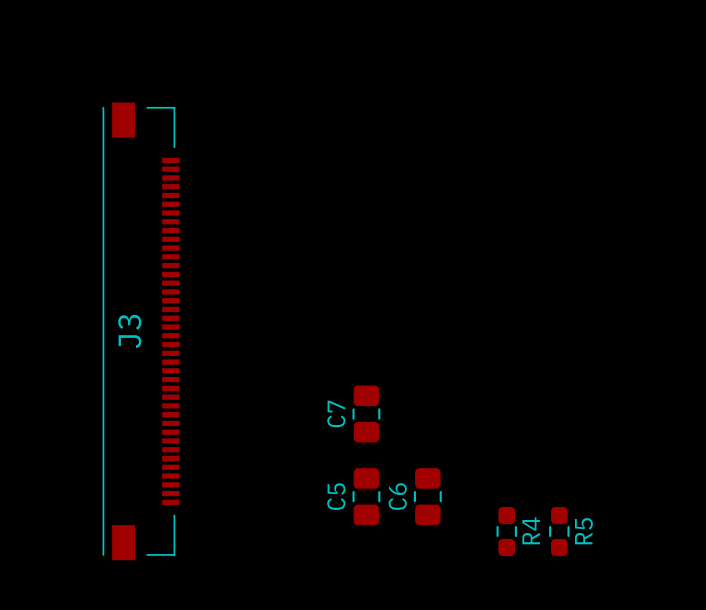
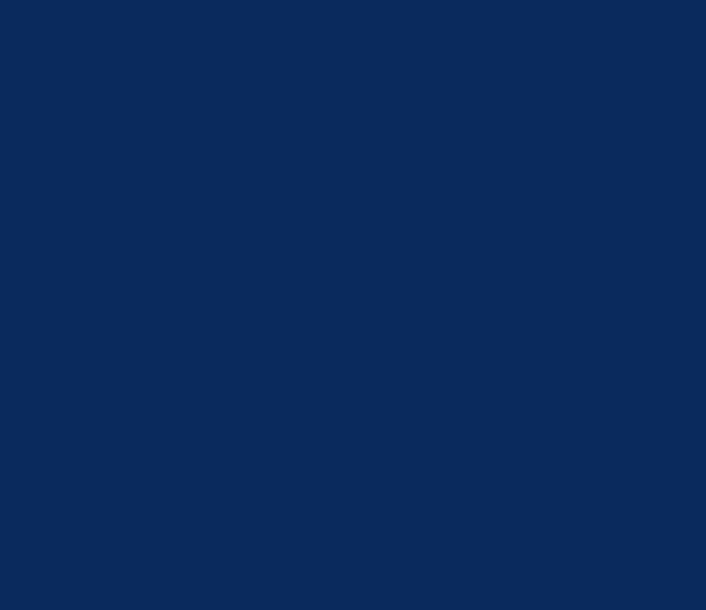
J3: (141, 331) -> none
C7: (366, 414) -> none
C5: (366, 496) -> none
C6: (427, 496) -> none
R4: (506, 531) -> none
R5: (559, 531) -> none

